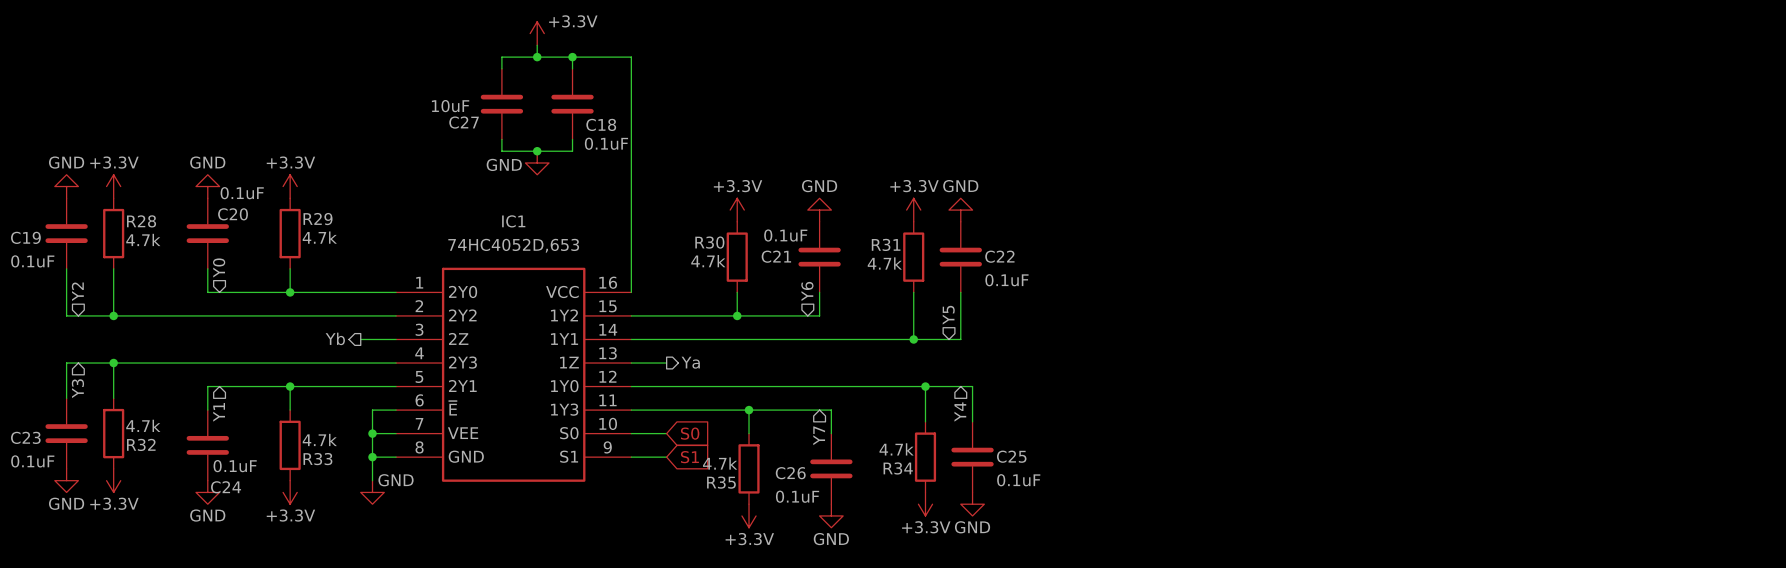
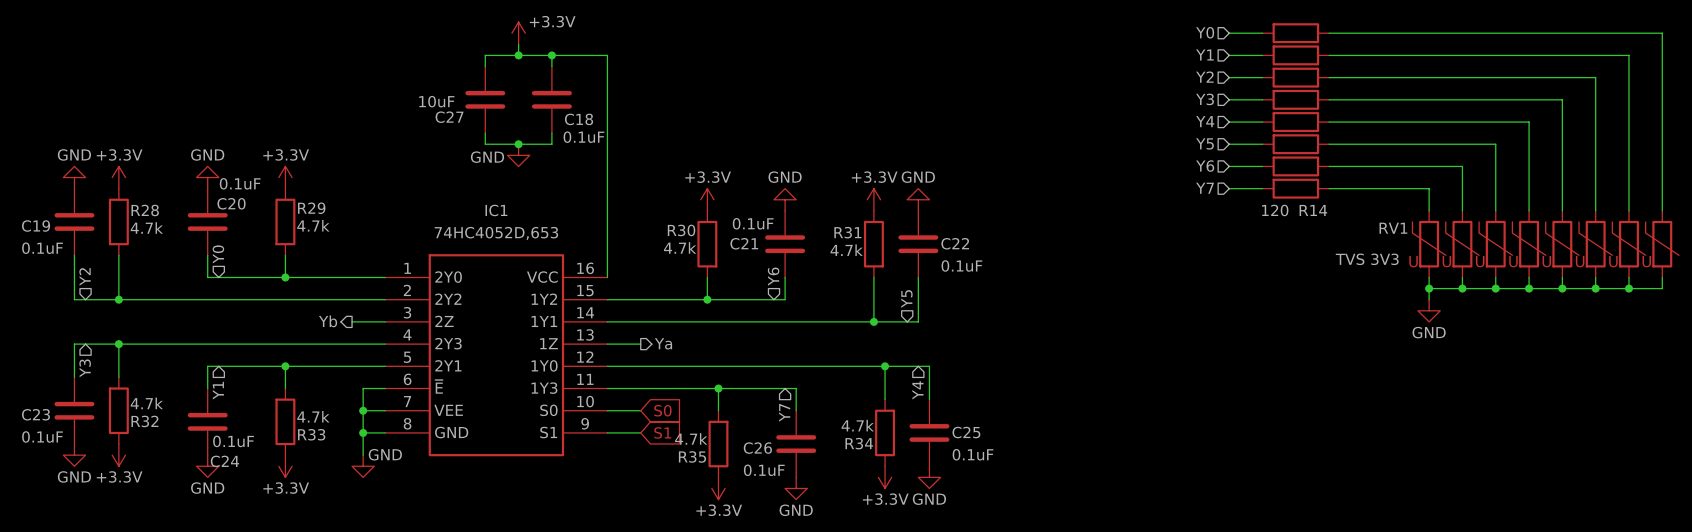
hierarchical label: none -> Y0 (1205, 32)
wire: none -> (1229, 33) (1262, 33)
part: none -> (1295, 33)
wire: none -> (1329, 33) (1662, 33) (1662, 210)
hierarchical label: none -> Y1 (1204, 55)
wire: none -> (1229, 55) (1262, 55)
part: none -> (1295, 55)
wire: none -> (1329, 55) (1628, 55) (1628, 210)
hierarchical label: none -> Y2 (1204, 77)
wire: none -> (1229, 77) (1262, 77)
part: none -> (1295, 77)
wire: none -> (1329, 77) (1595, 77) (1595, 210)
hierarchical label: none -> Y3 (1205, 99)
wire: none -> (1229, 99) (1262, 99)
part: none -> (1295, 99)
wire: none -> (1329, 99) (1562, 99) (1562, 210)
hierarchical label: none -> Y4 (1205, 121)
wire: none -> (1229, 122) (1262, 122)
part: none -> (1295, 122)
wire: none -> (1329, 122) (1529, 122) (1529, 210)
hierarchical label: none -> Y5 (1204, 143)
wire: none -> (1229, 144) (1262, 144)
part: none -> (1295, 144)
wire: none -> (1329, 144) (1495, 144) (1495, 210)
hierarchical label: none -> Y6 (1205, 166)
wire: none -> (1229, 166) (1262, 166)
part: none -> (1295, 166)
wire: none -> (1329, 166) (1462, 166) (1462, 210)
hierarchical label: none -> Y7 (1204, 188)
wire: none -> (1229, 188) (1262, 188)
R14: none -> 120 (1295, 188)
wire: none -> (1329, 188) (1429, 188) (1429, 210)
RV1: none -> TVS 3V3 (1429, 244)
part: none -> (1462, 244)
part: none -> (1495, 244)
part: none -> (1529, 244)
part: none -> (1562, 244)
part: none -> (1595, 244)
part: none -> (1628, 244)
part: none -> (1662, 244)
wire: none -> (1429, 277) (1429, 299)
wire: none -> (1462, 277) (1462, 288)
wire: none -> (1495, 277) (1495, 288)
wire: none -> (1529, 277) (1529, 288)
wire: none -> (1562, 277) (1562, 288)
wire: none -> (1595, 277) (1595, 288)
wire: none -> (1628, 277) (1628, 288)
wire: none -> (1662, 277) (1662, 288) (1429, 288)
junction: none -> (1429, 288)
junction: none -> (1462, 288)
junction: none -> (1495, 288)
junction: none -> (1529, 288)
junction: none -> (1562, 288)
junction: none -> (1595, 288)
junction: none -> (1628, 288)
power symbol: none -> GND (1429, 310)

